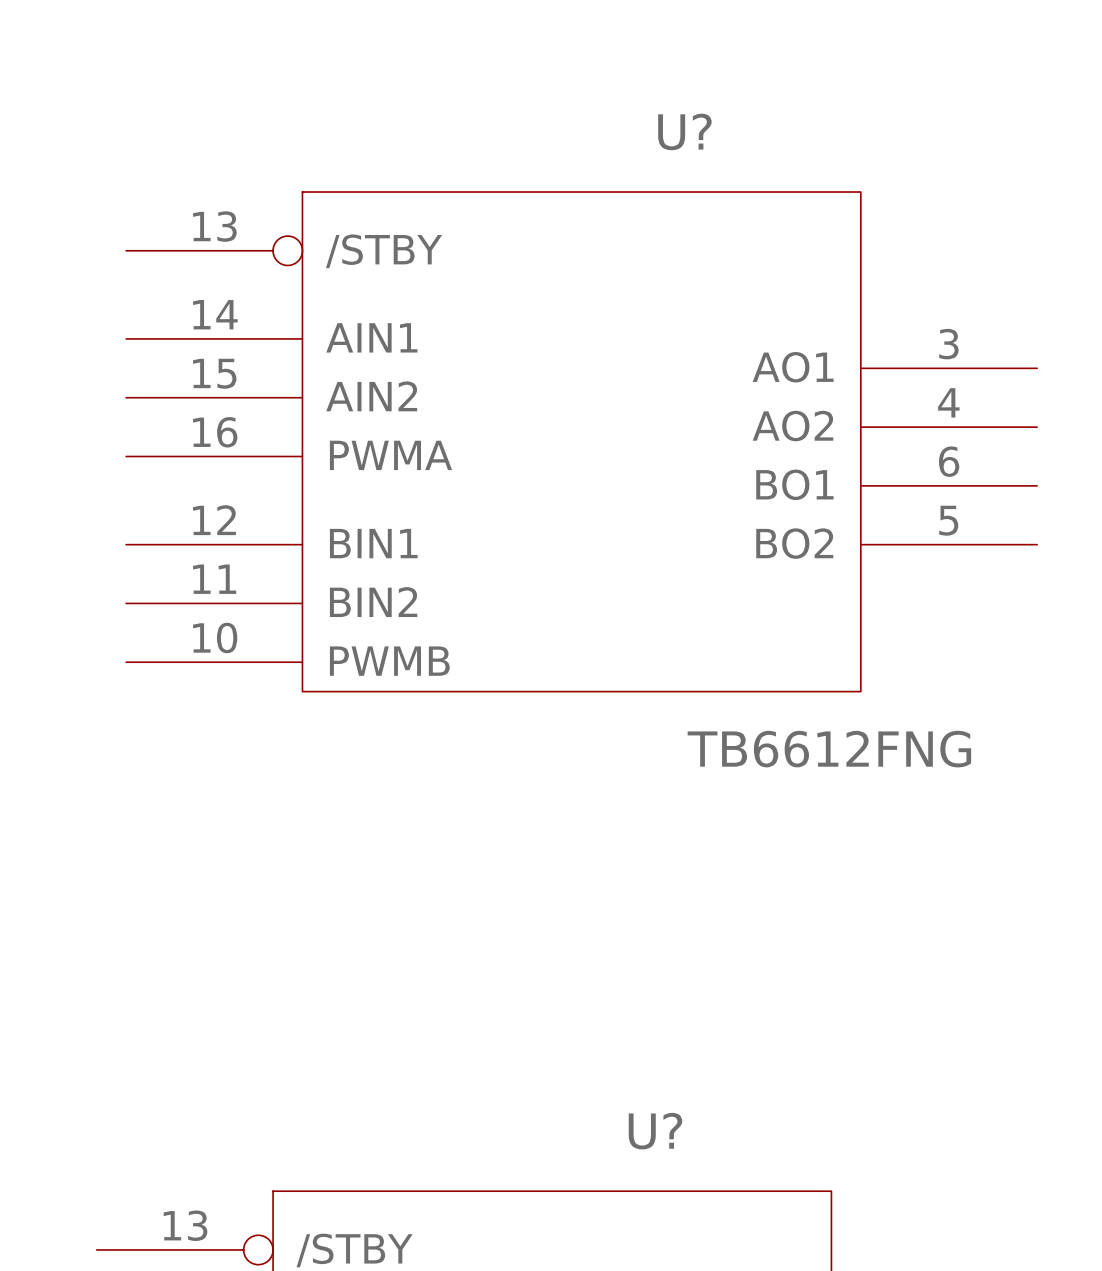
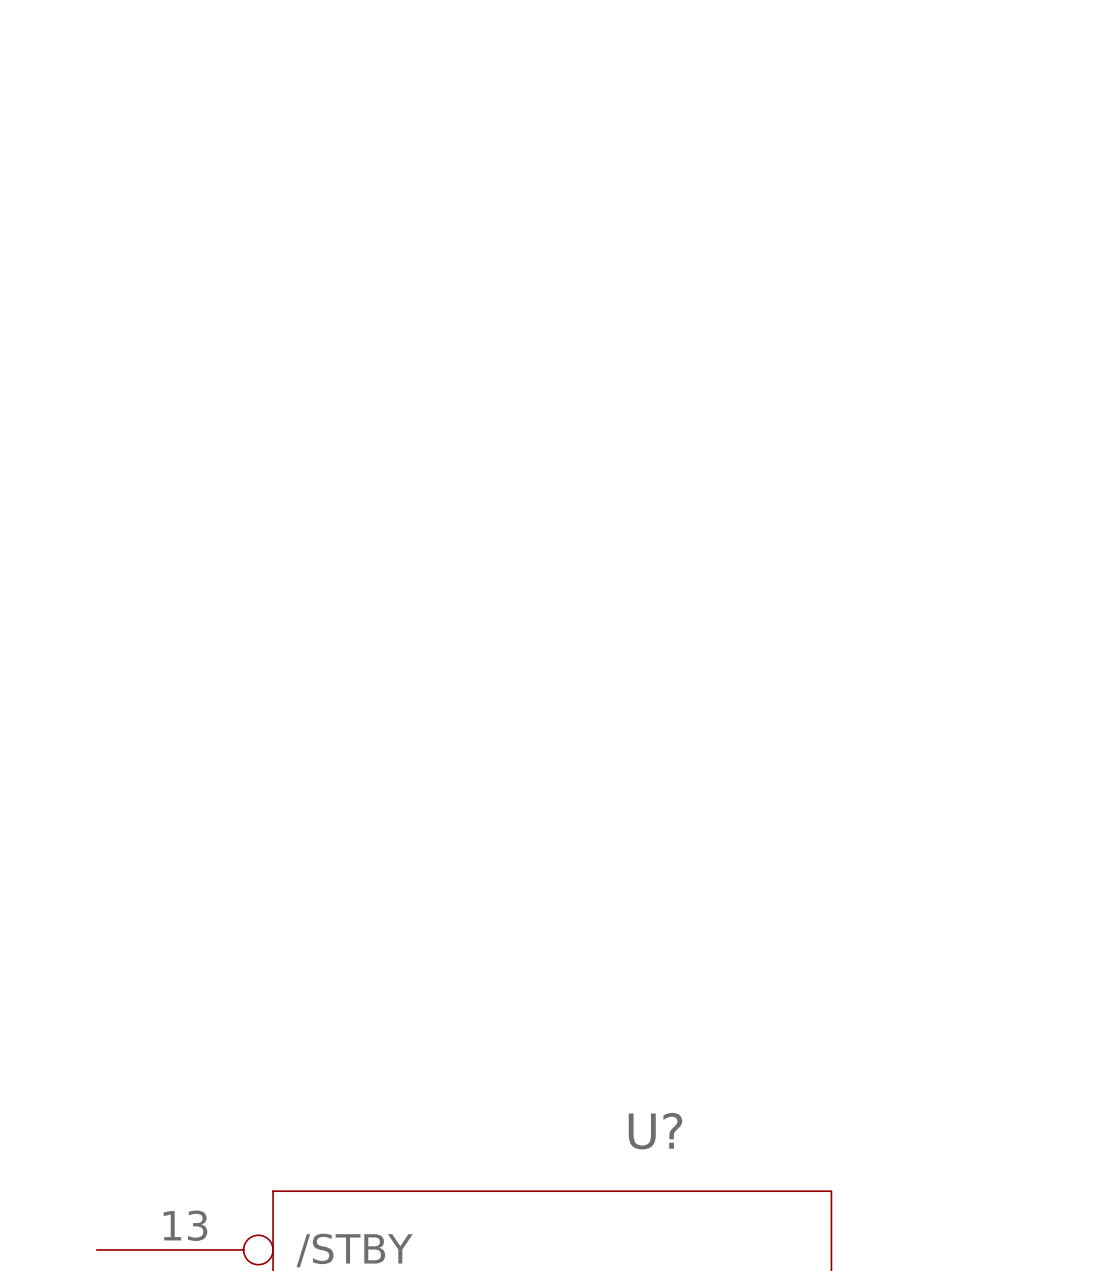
U?: TB6612FNG (581, 441) -> none

